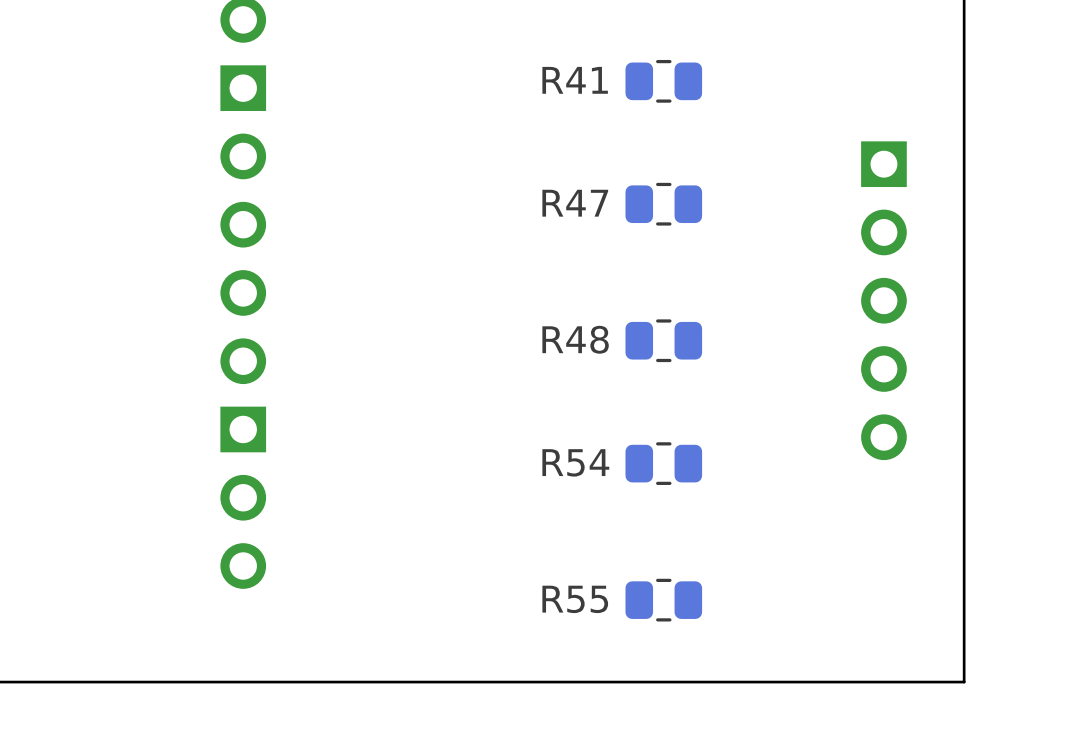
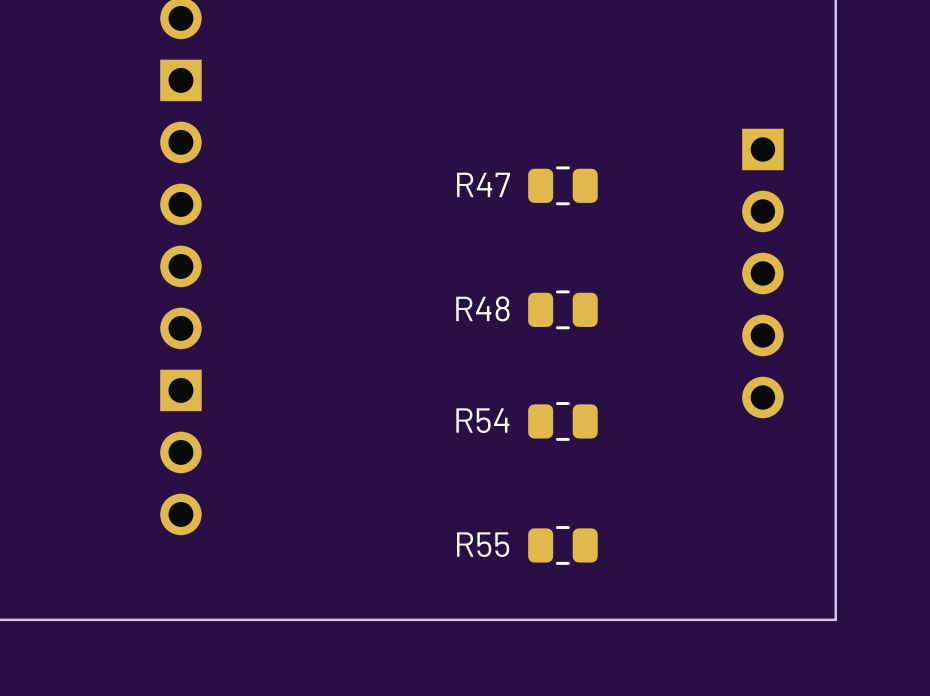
R41: (663, 81) -> none

